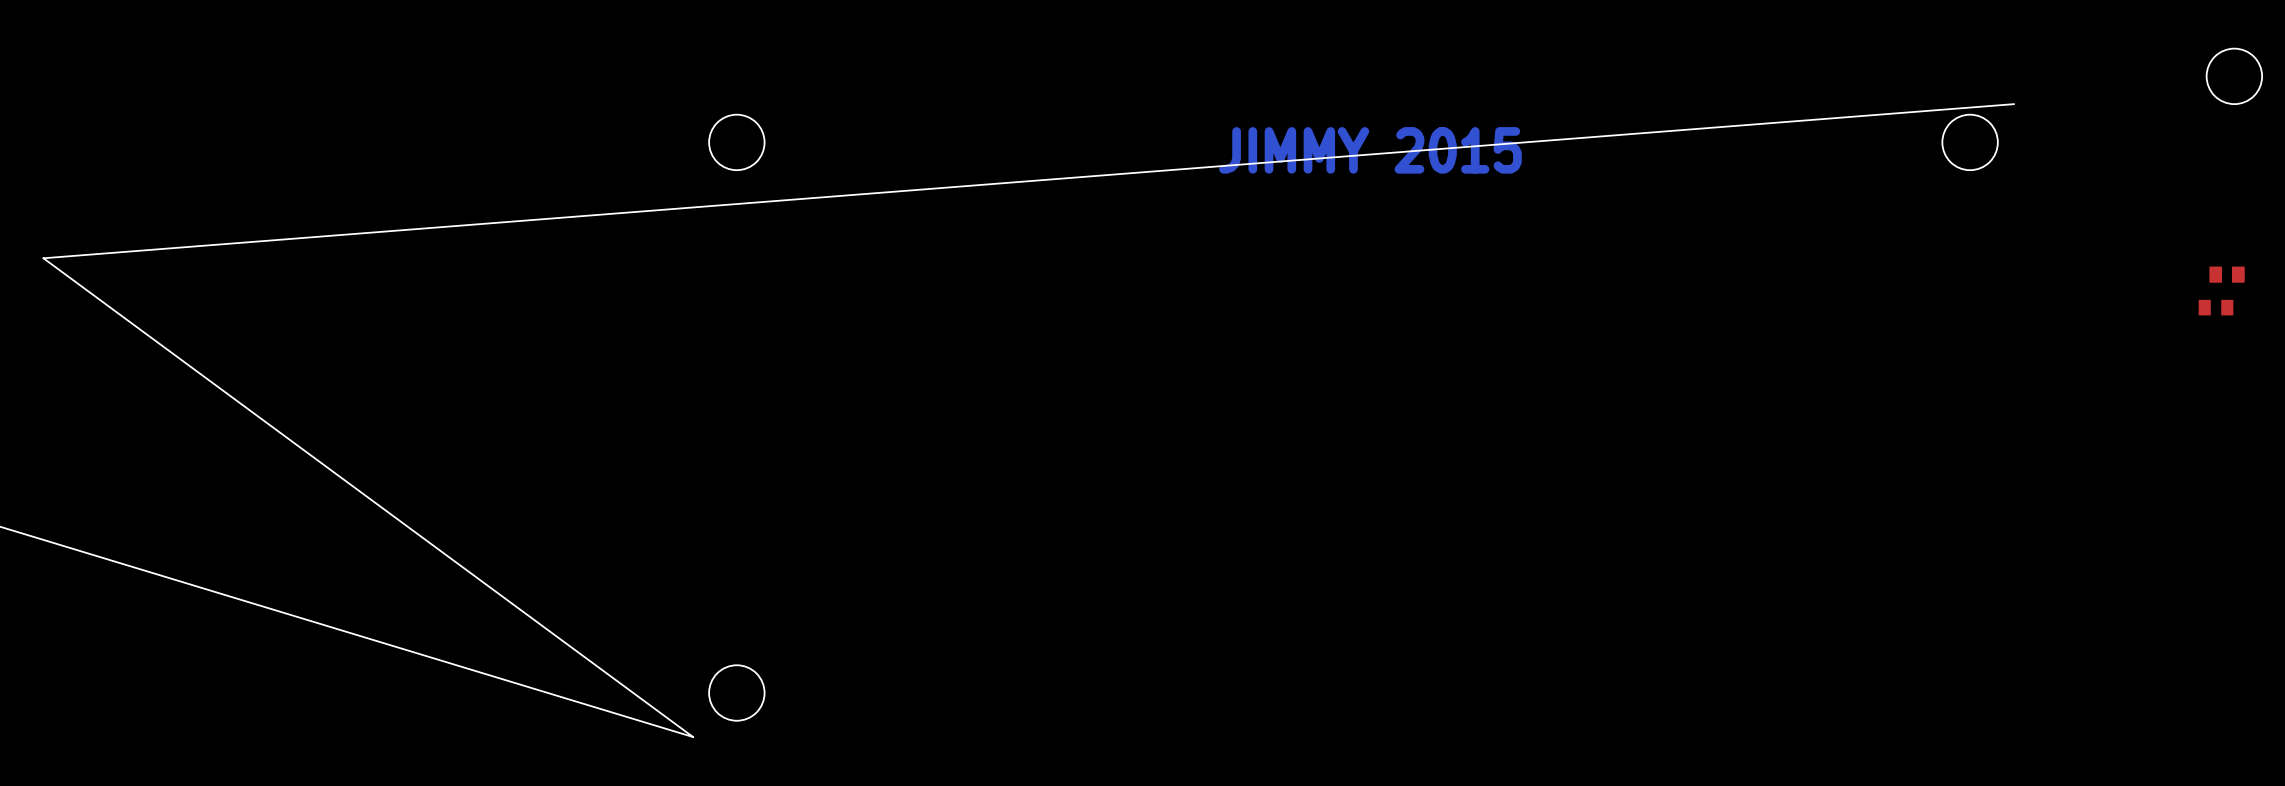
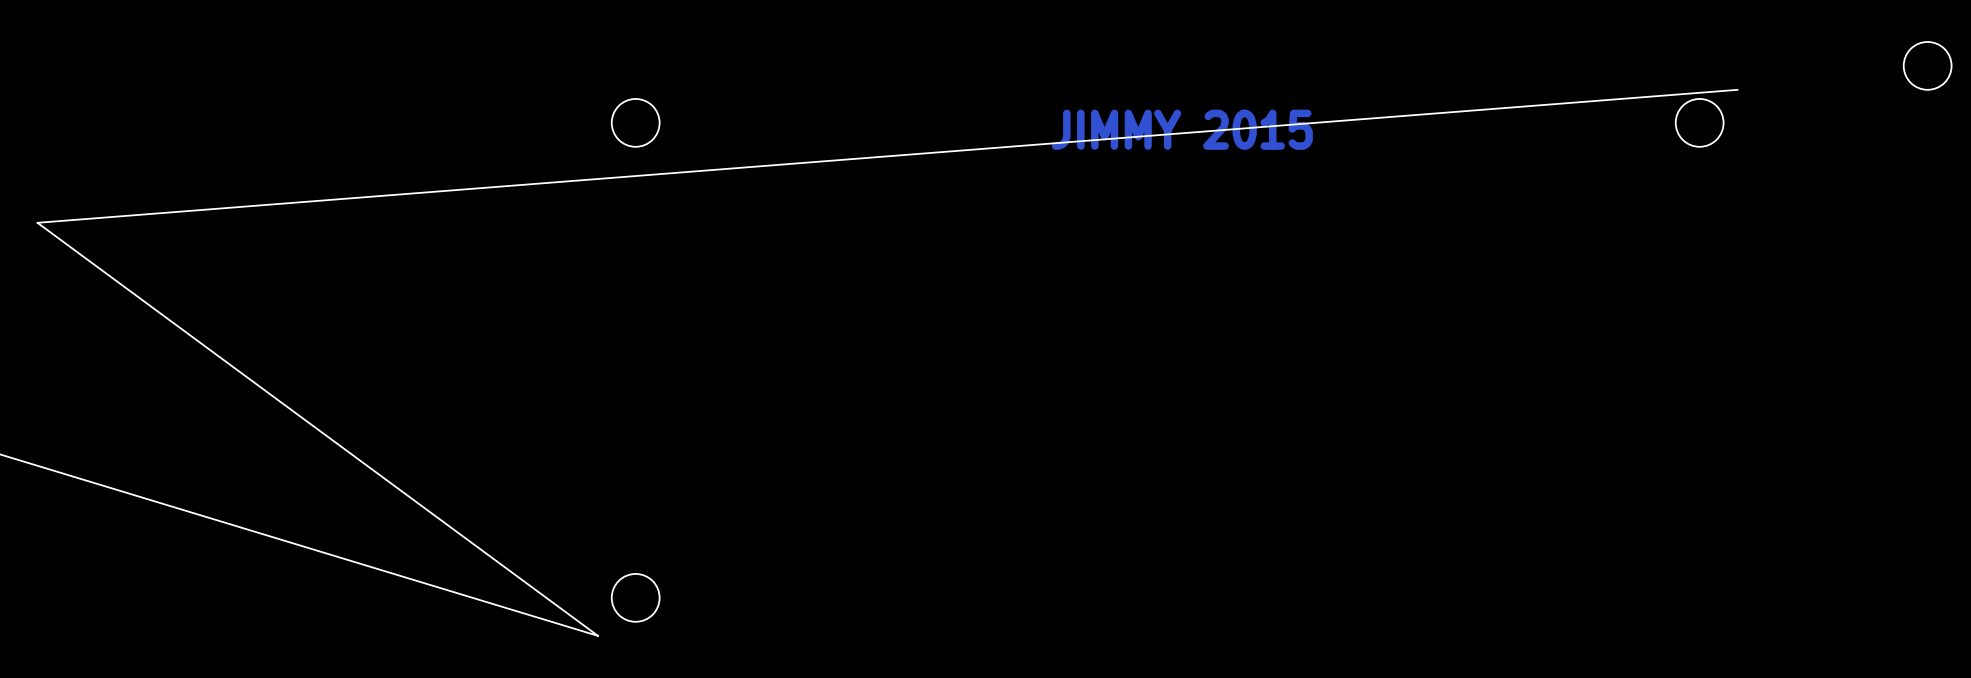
part: (2227, 274) -> none
part: (2216, 307) -> none

